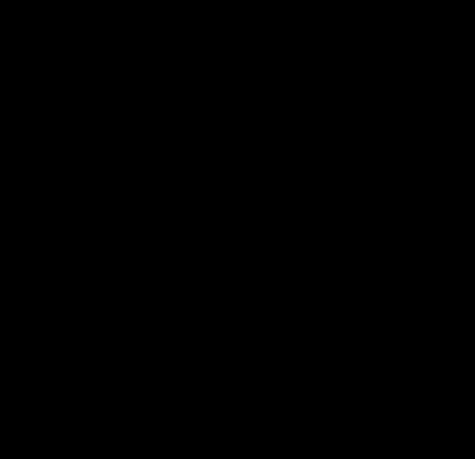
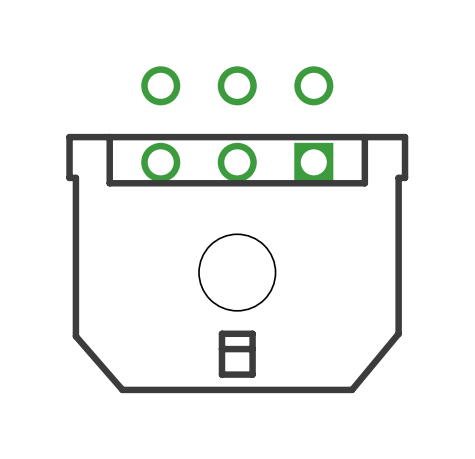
part: none -> (237, 229)

